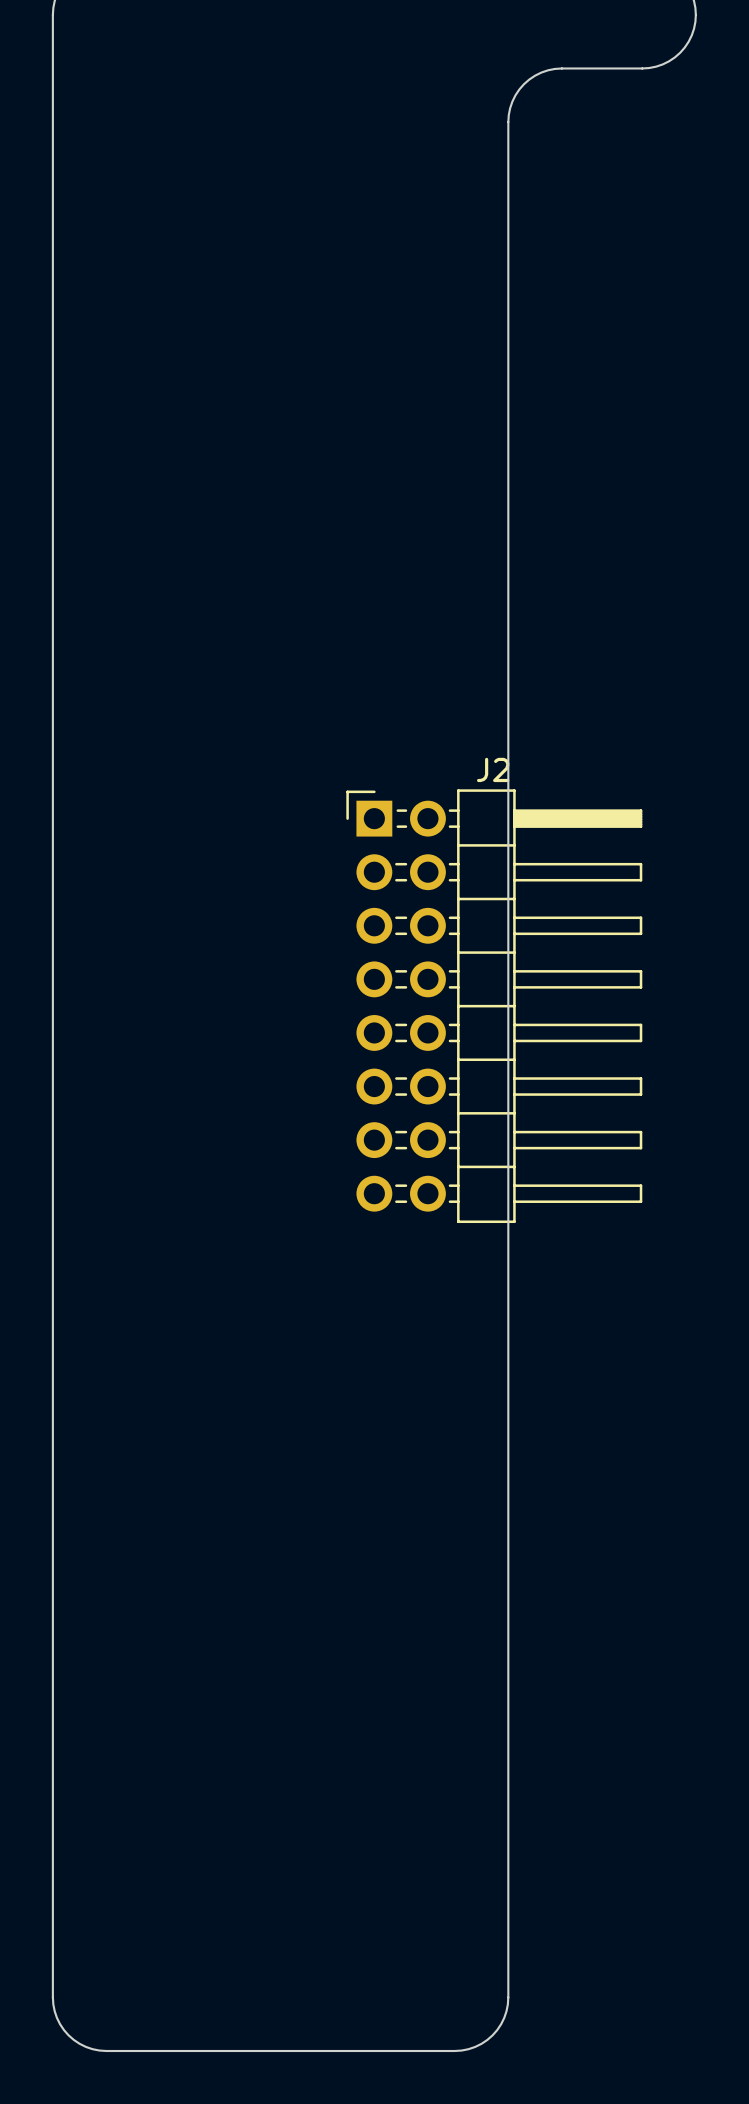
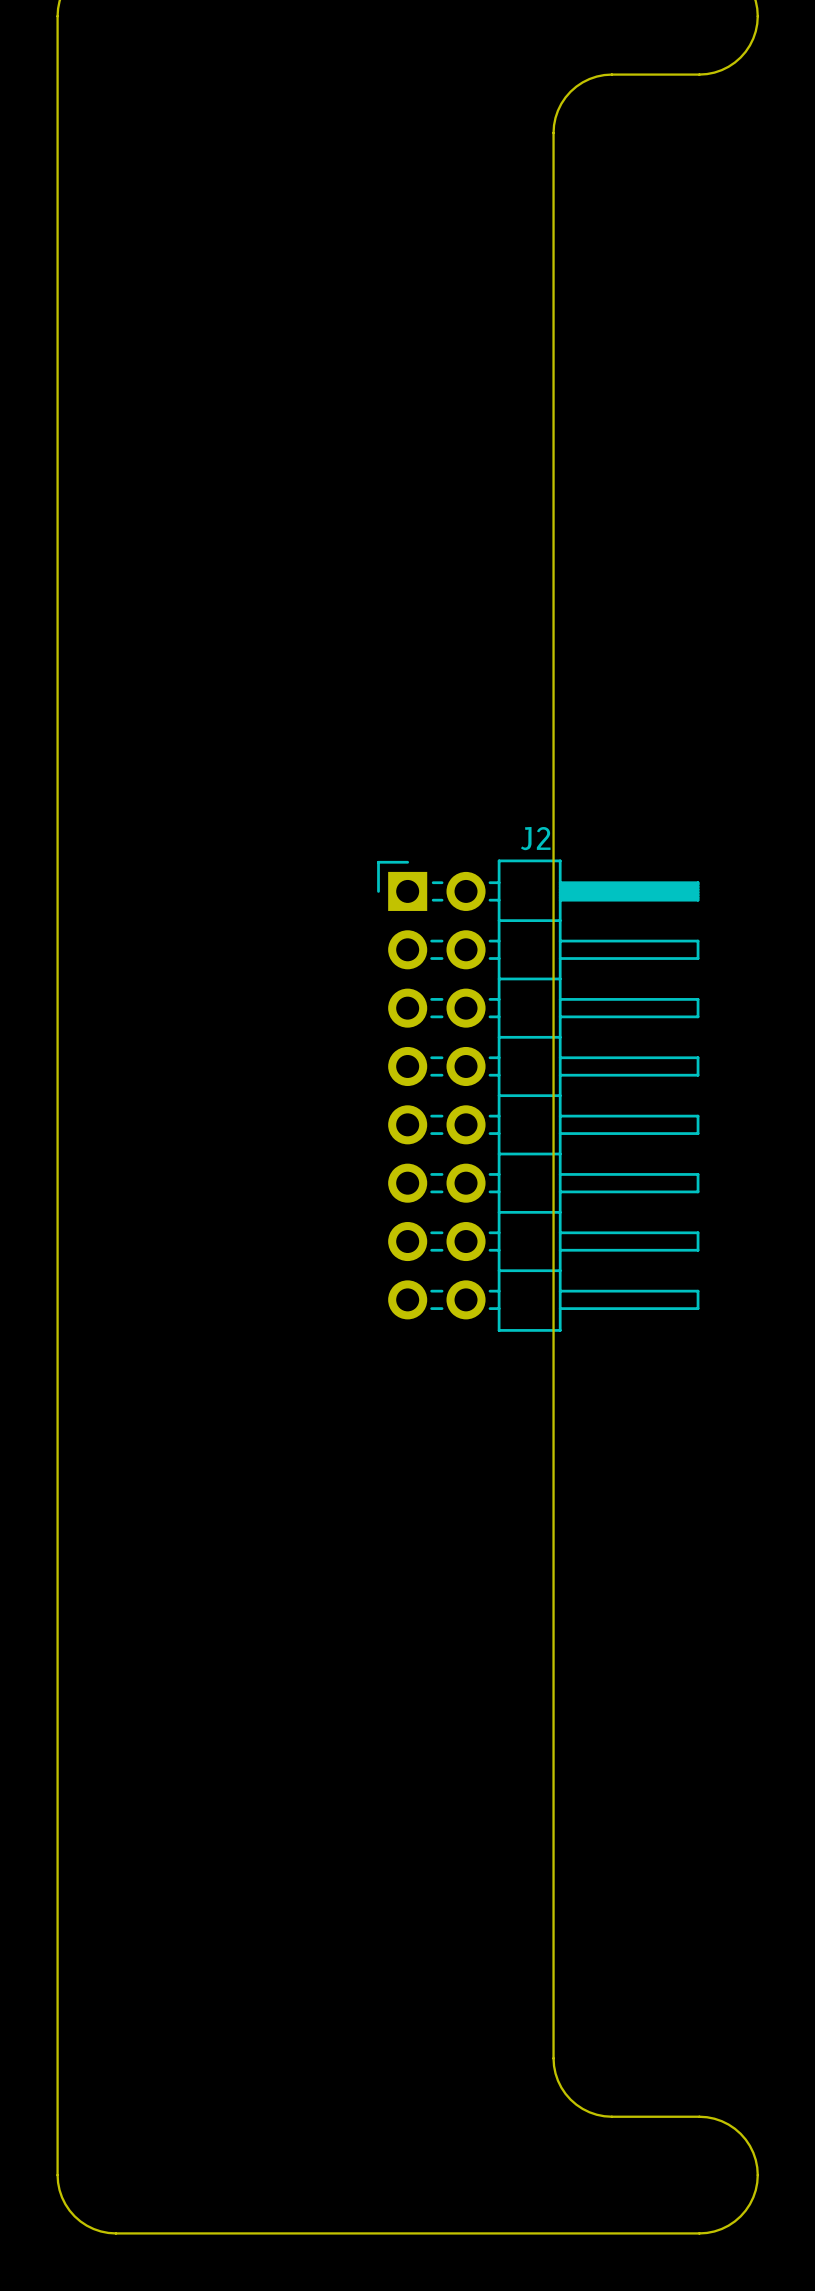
board edge: (508, 1890) (508, 1997) (506, 2011) (501, 2024) (487, 2039) (468, 2049) (454, 2051) -> (553, 2058) (557, 2080) (565, 2093) (576, 2104) (589, 2112) (611, 2116) (707, 2117) (728, 2124) (740, 2133) (753, 2152) (757, 2175) (755, 2190) (745, 2210) (734, 2221) (721, 2228) (707, 2232) (495, 2233)

